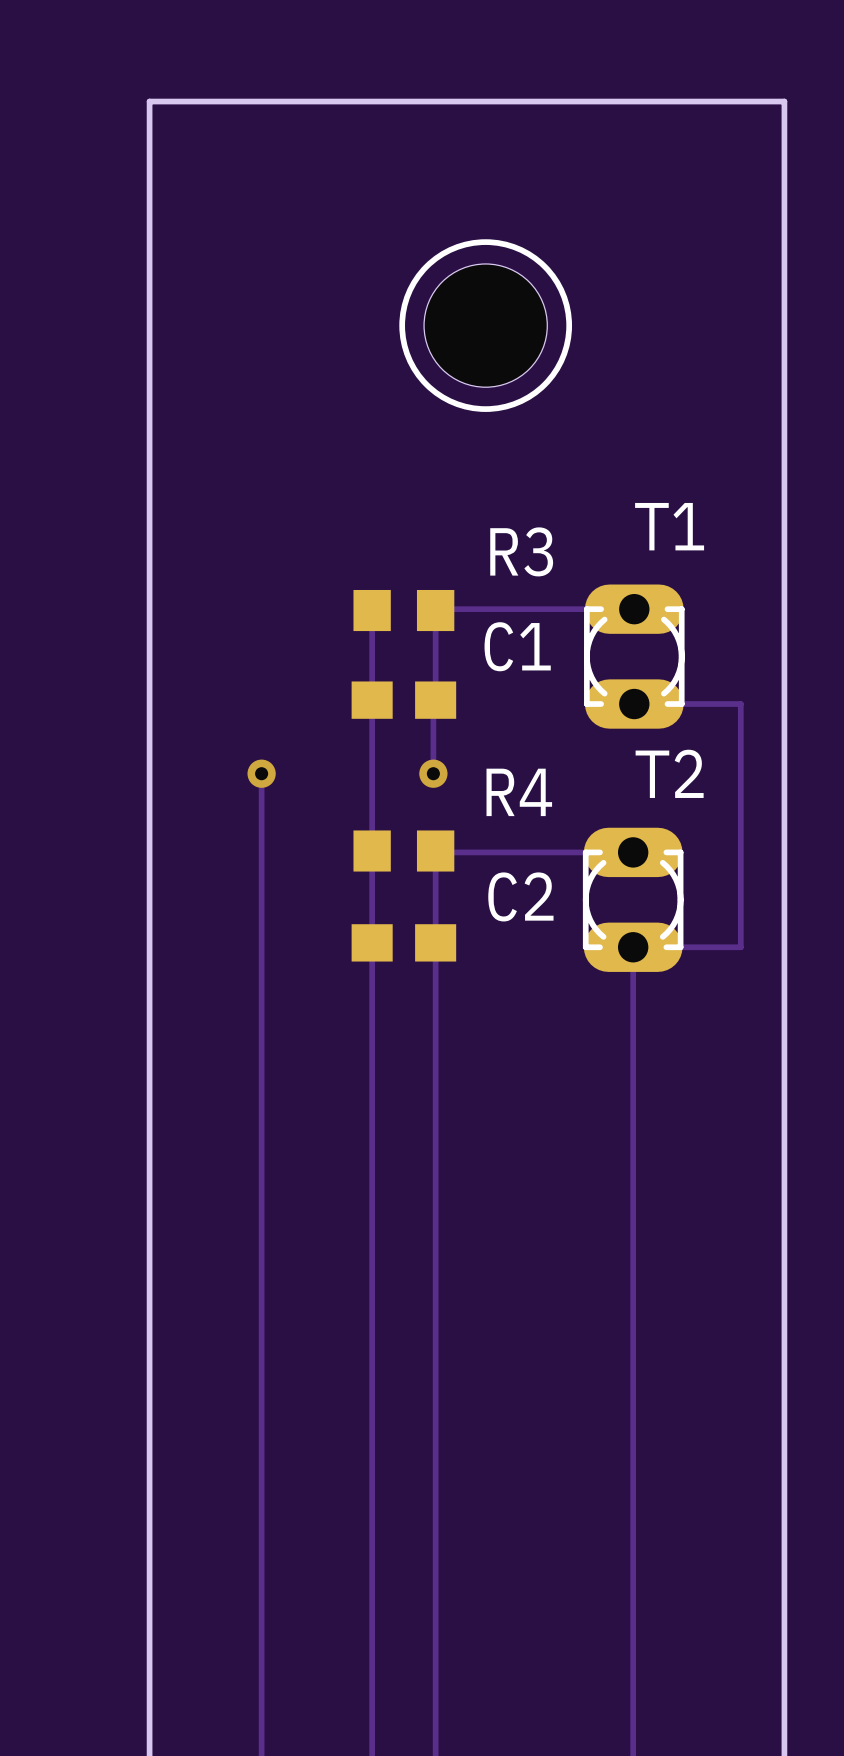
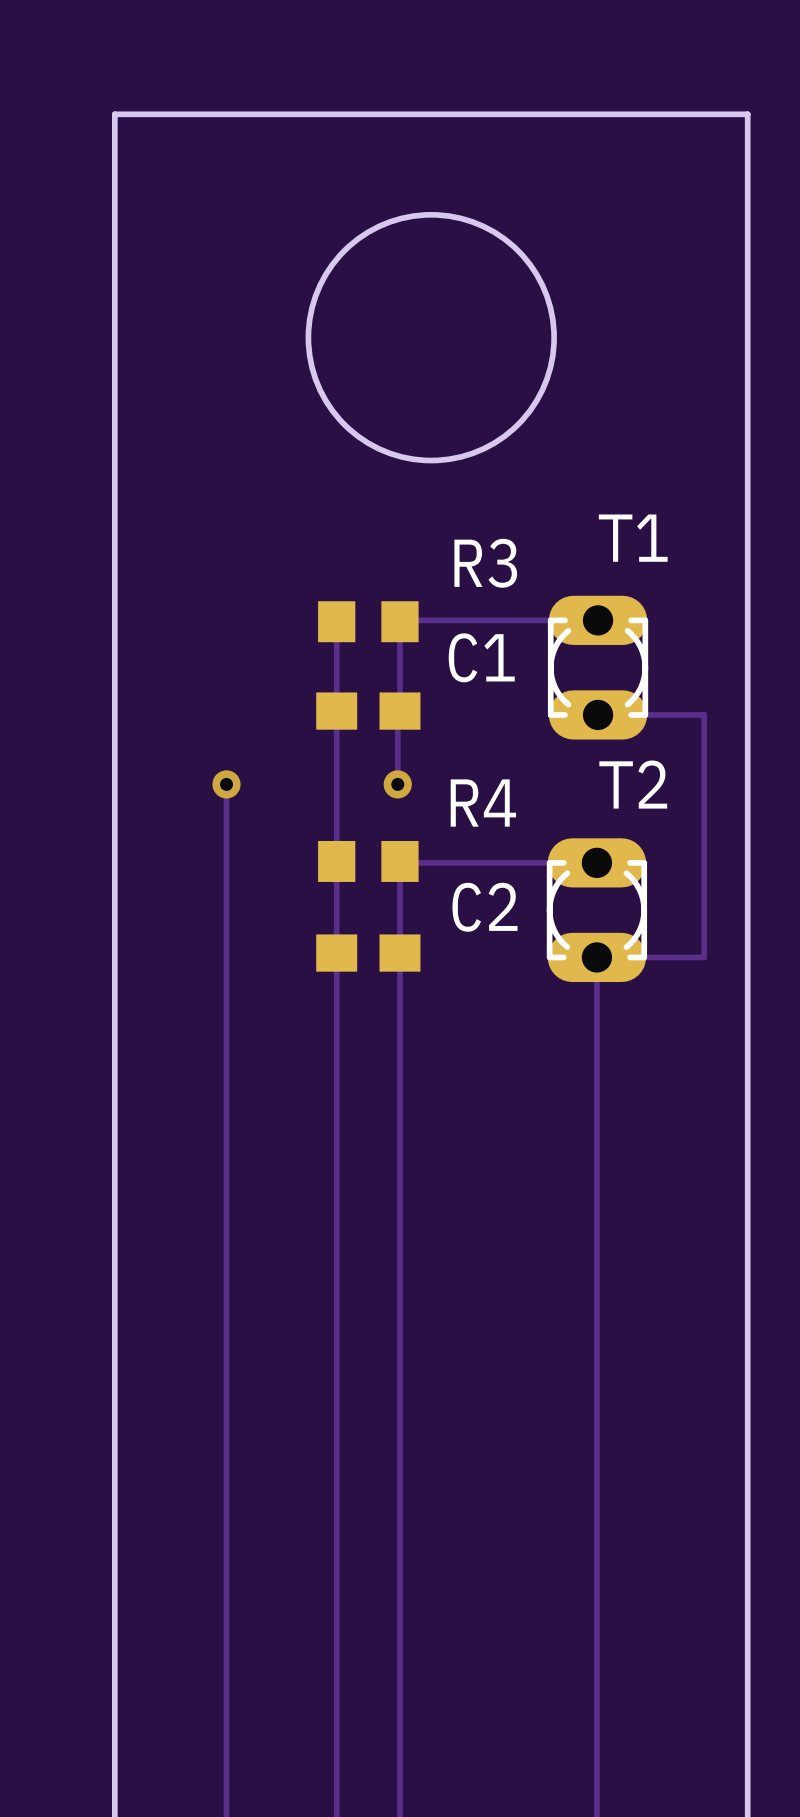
round board edge: none -> [305, 211, 557, 464]
drawing: [399, 239, 573, 412] -> none
hole: (485, 325) -> none

